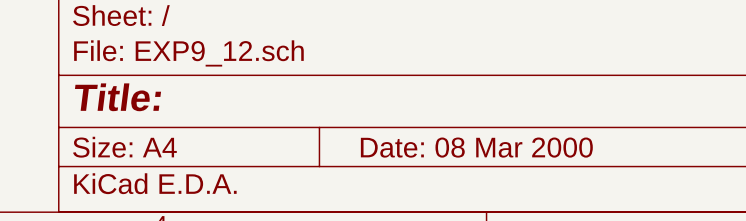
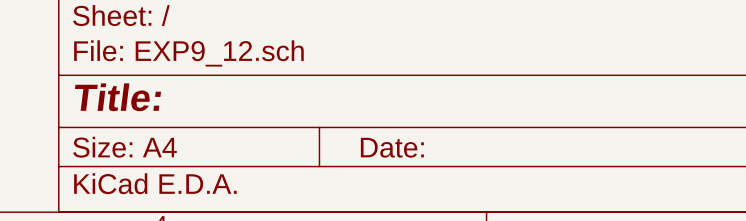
title block: Date: 08 Mar 2000 (476, 147) -> Date: (392, 147)

